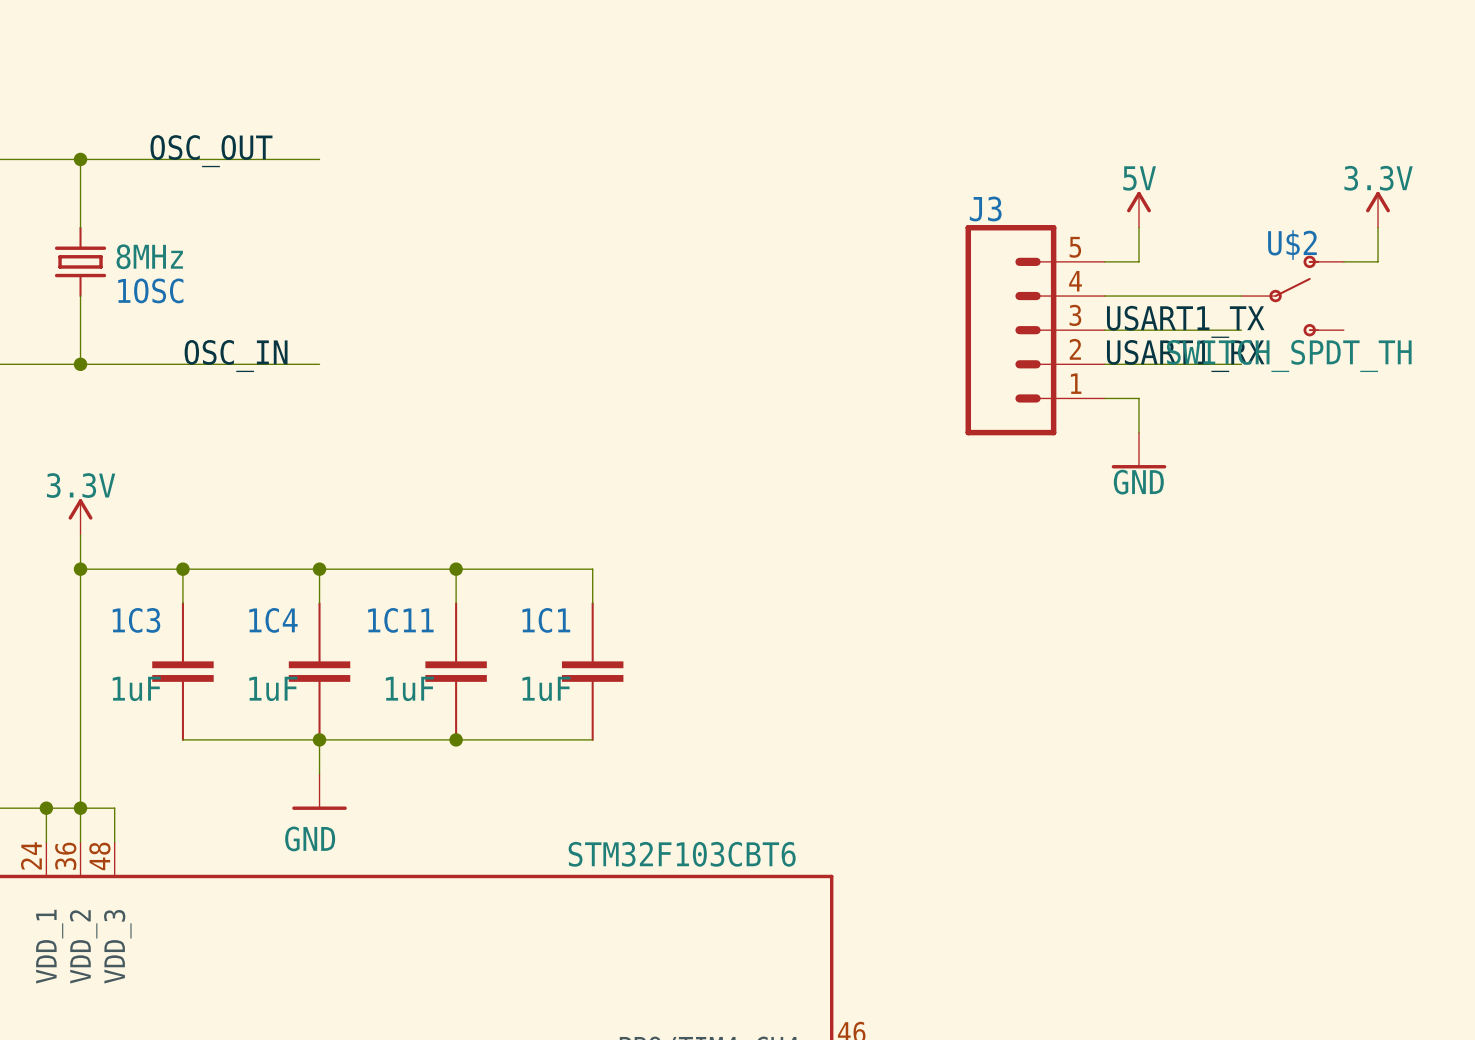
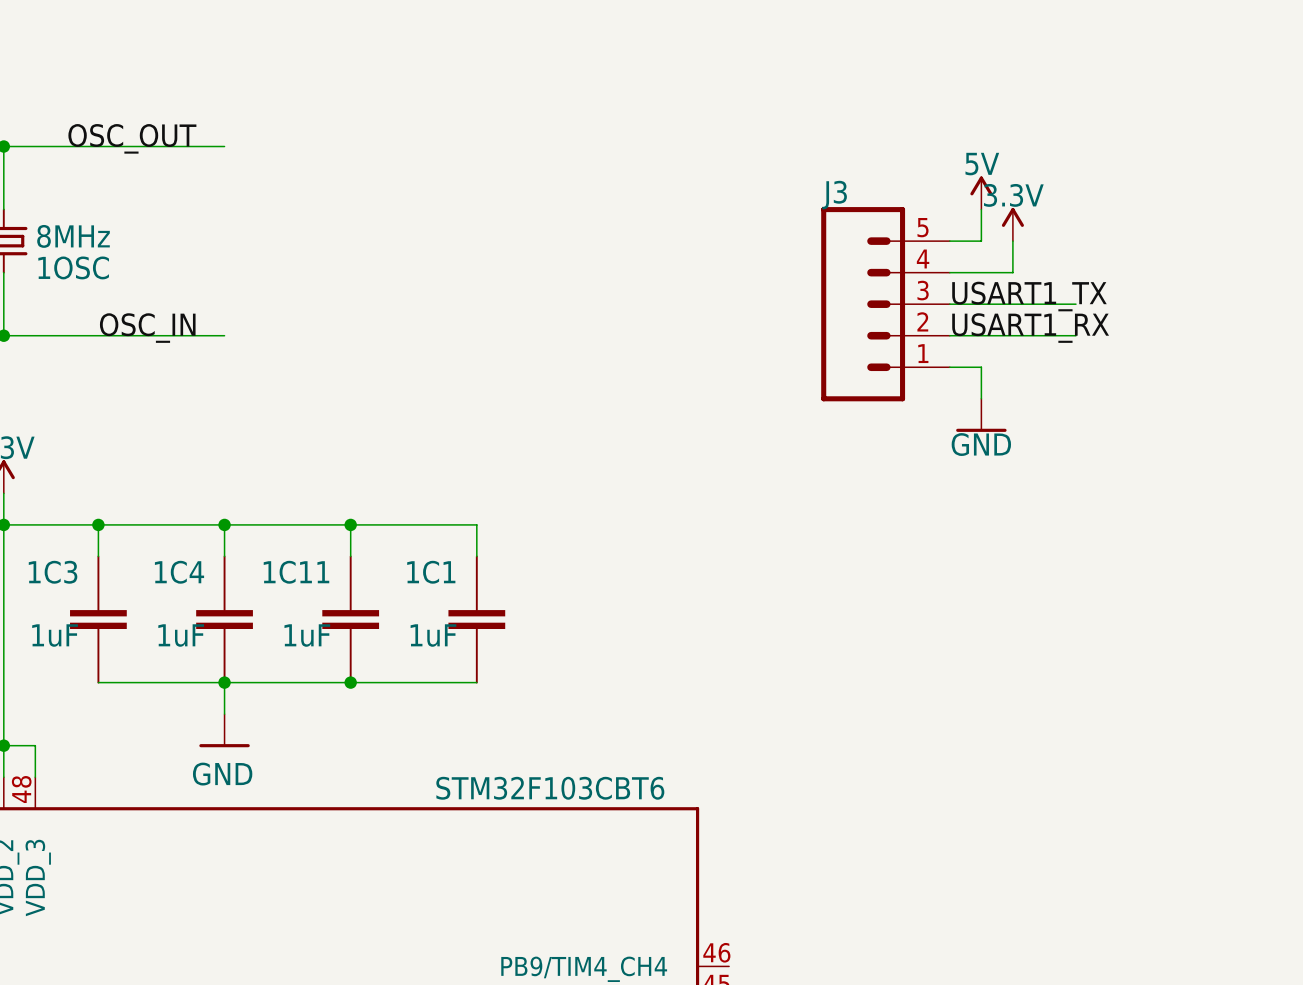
power symbol position: 3.3V (1378, 209) -> 3.3V (1012, 224)
wire: (1378, 227) (1378, 261) (1343, 261) -> none
wire: (1173, 296) (1241, 296) -> (1012, 272) (1012, 241)
U$2: SWITCH_SPDT_TH (1292, 296) -> none

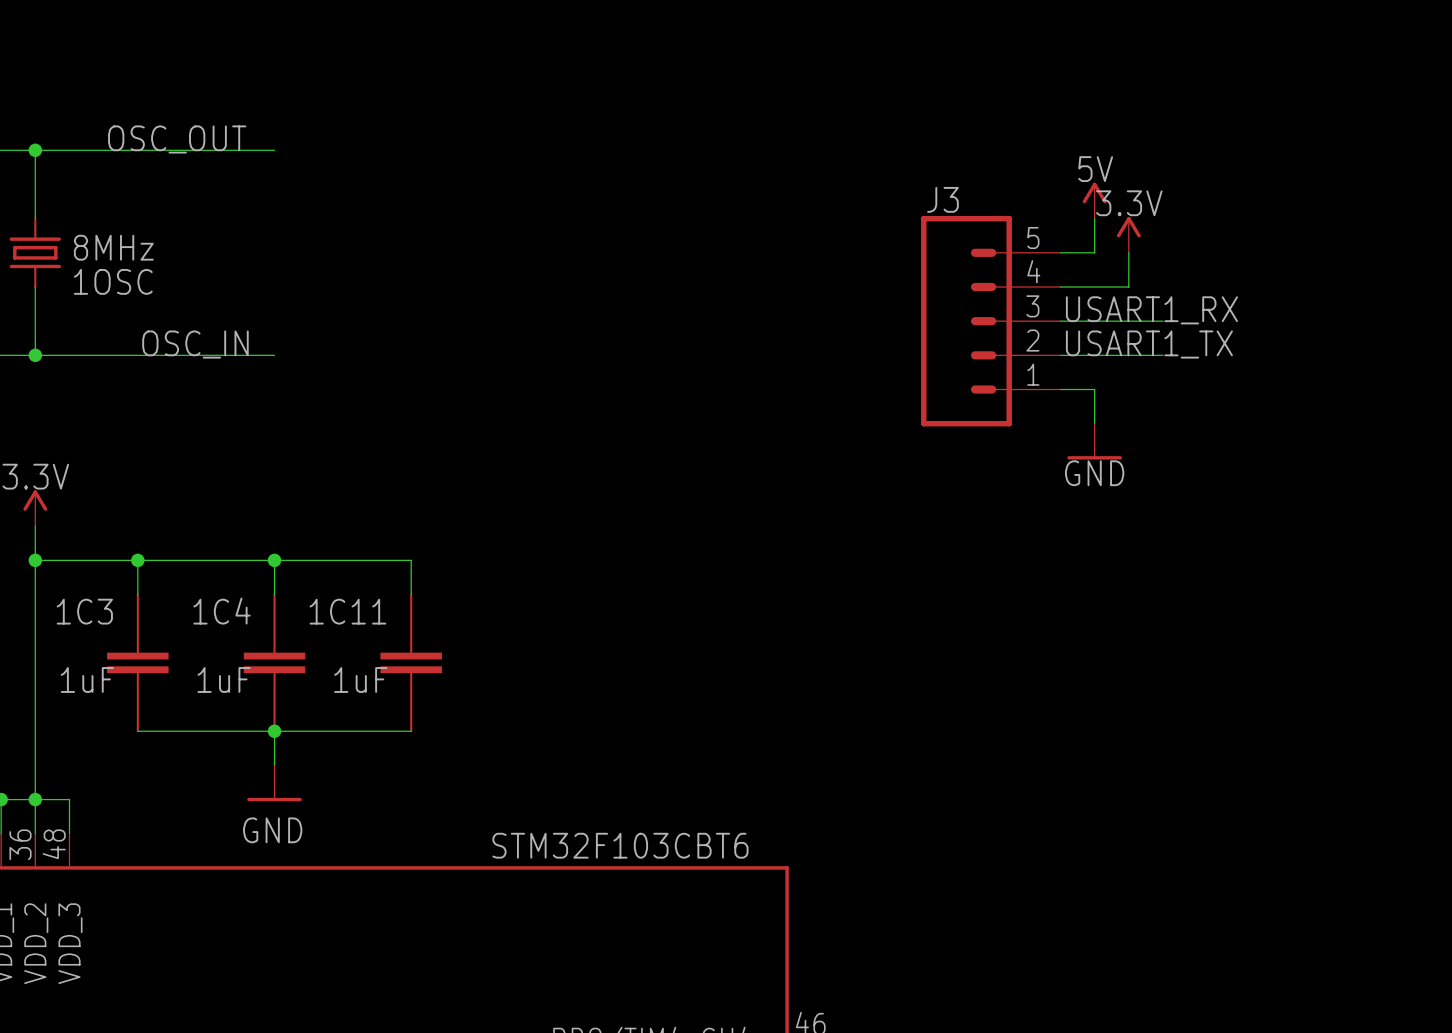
label: USART1_TX (1029, 296) -> USART1_RX (1151, 310)
wire: (1044, 304) (1075, 304) -> none
label: USART1_RX (1030, 328) -> USART1_TX (1149, 344)
wire: (1044, 335) (1075, 335) -> none
wire: (350, 524) (476, 524) (476, 556) -> none
junction: (350, 524) -> none
1C1: 1uF (476, 619) -> none
wire: (350, 682) (476, 682) -> none
junction: (350, 682) -> none

